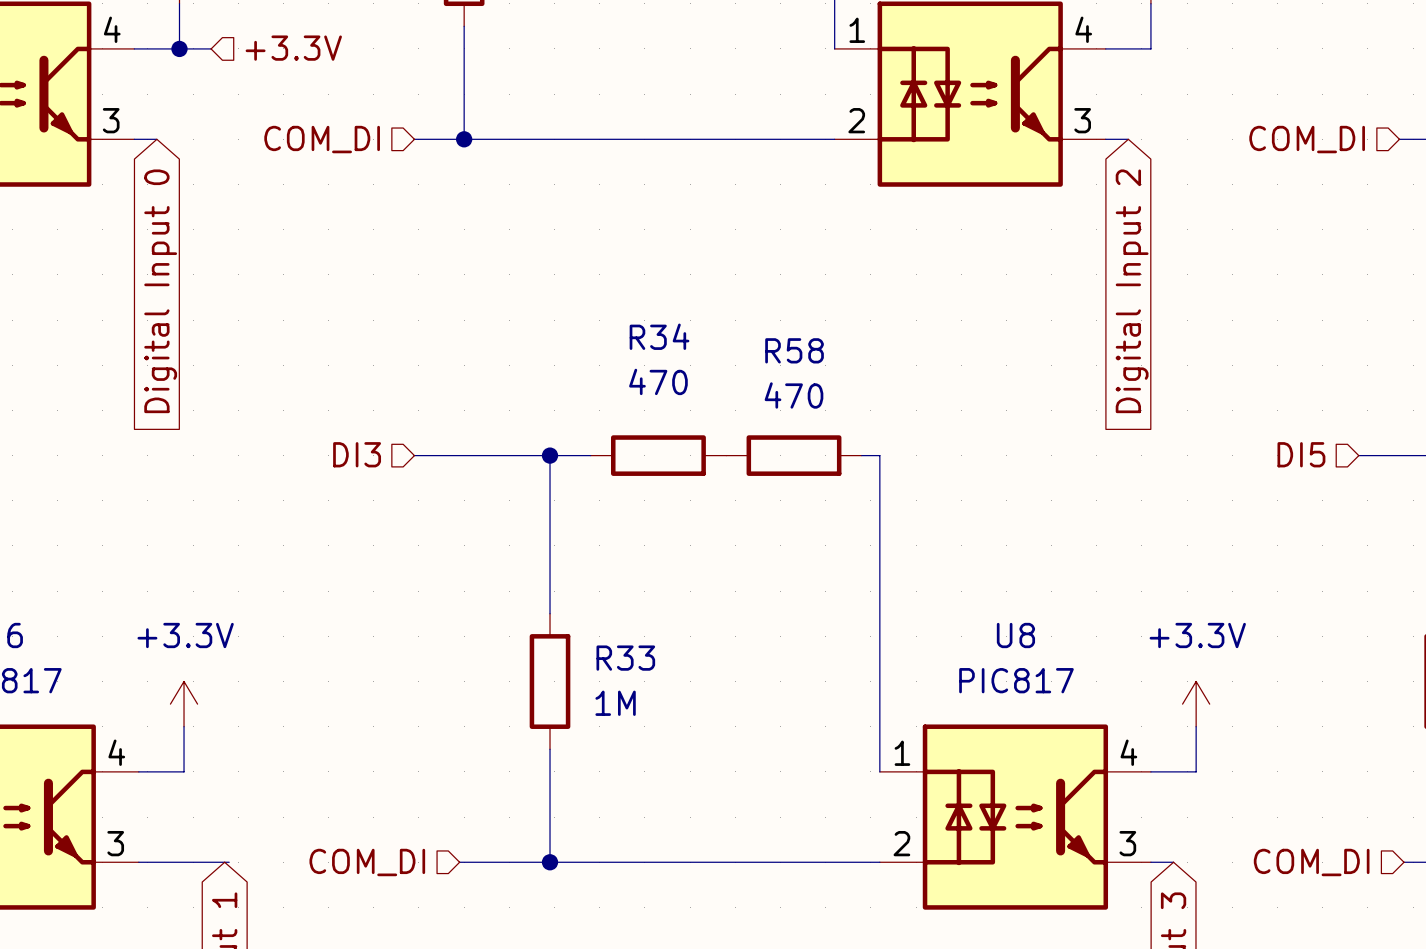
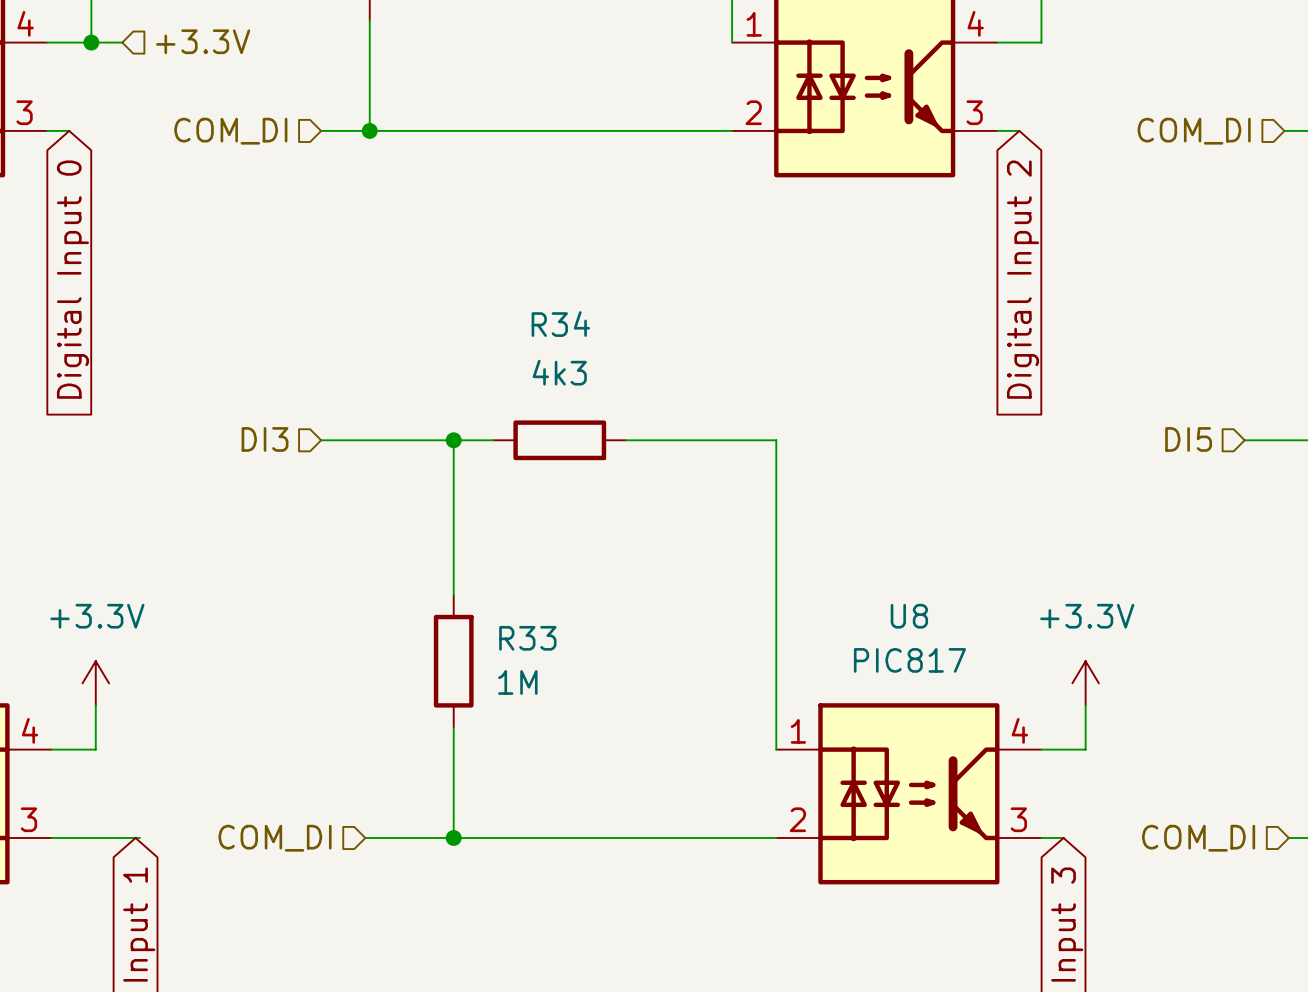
R34 value: 470 (658, 381) -> 4k3 (559, 372)
wire: none -> (626, 440) (758, 440)
R58: 470 (794, 455) -> none

